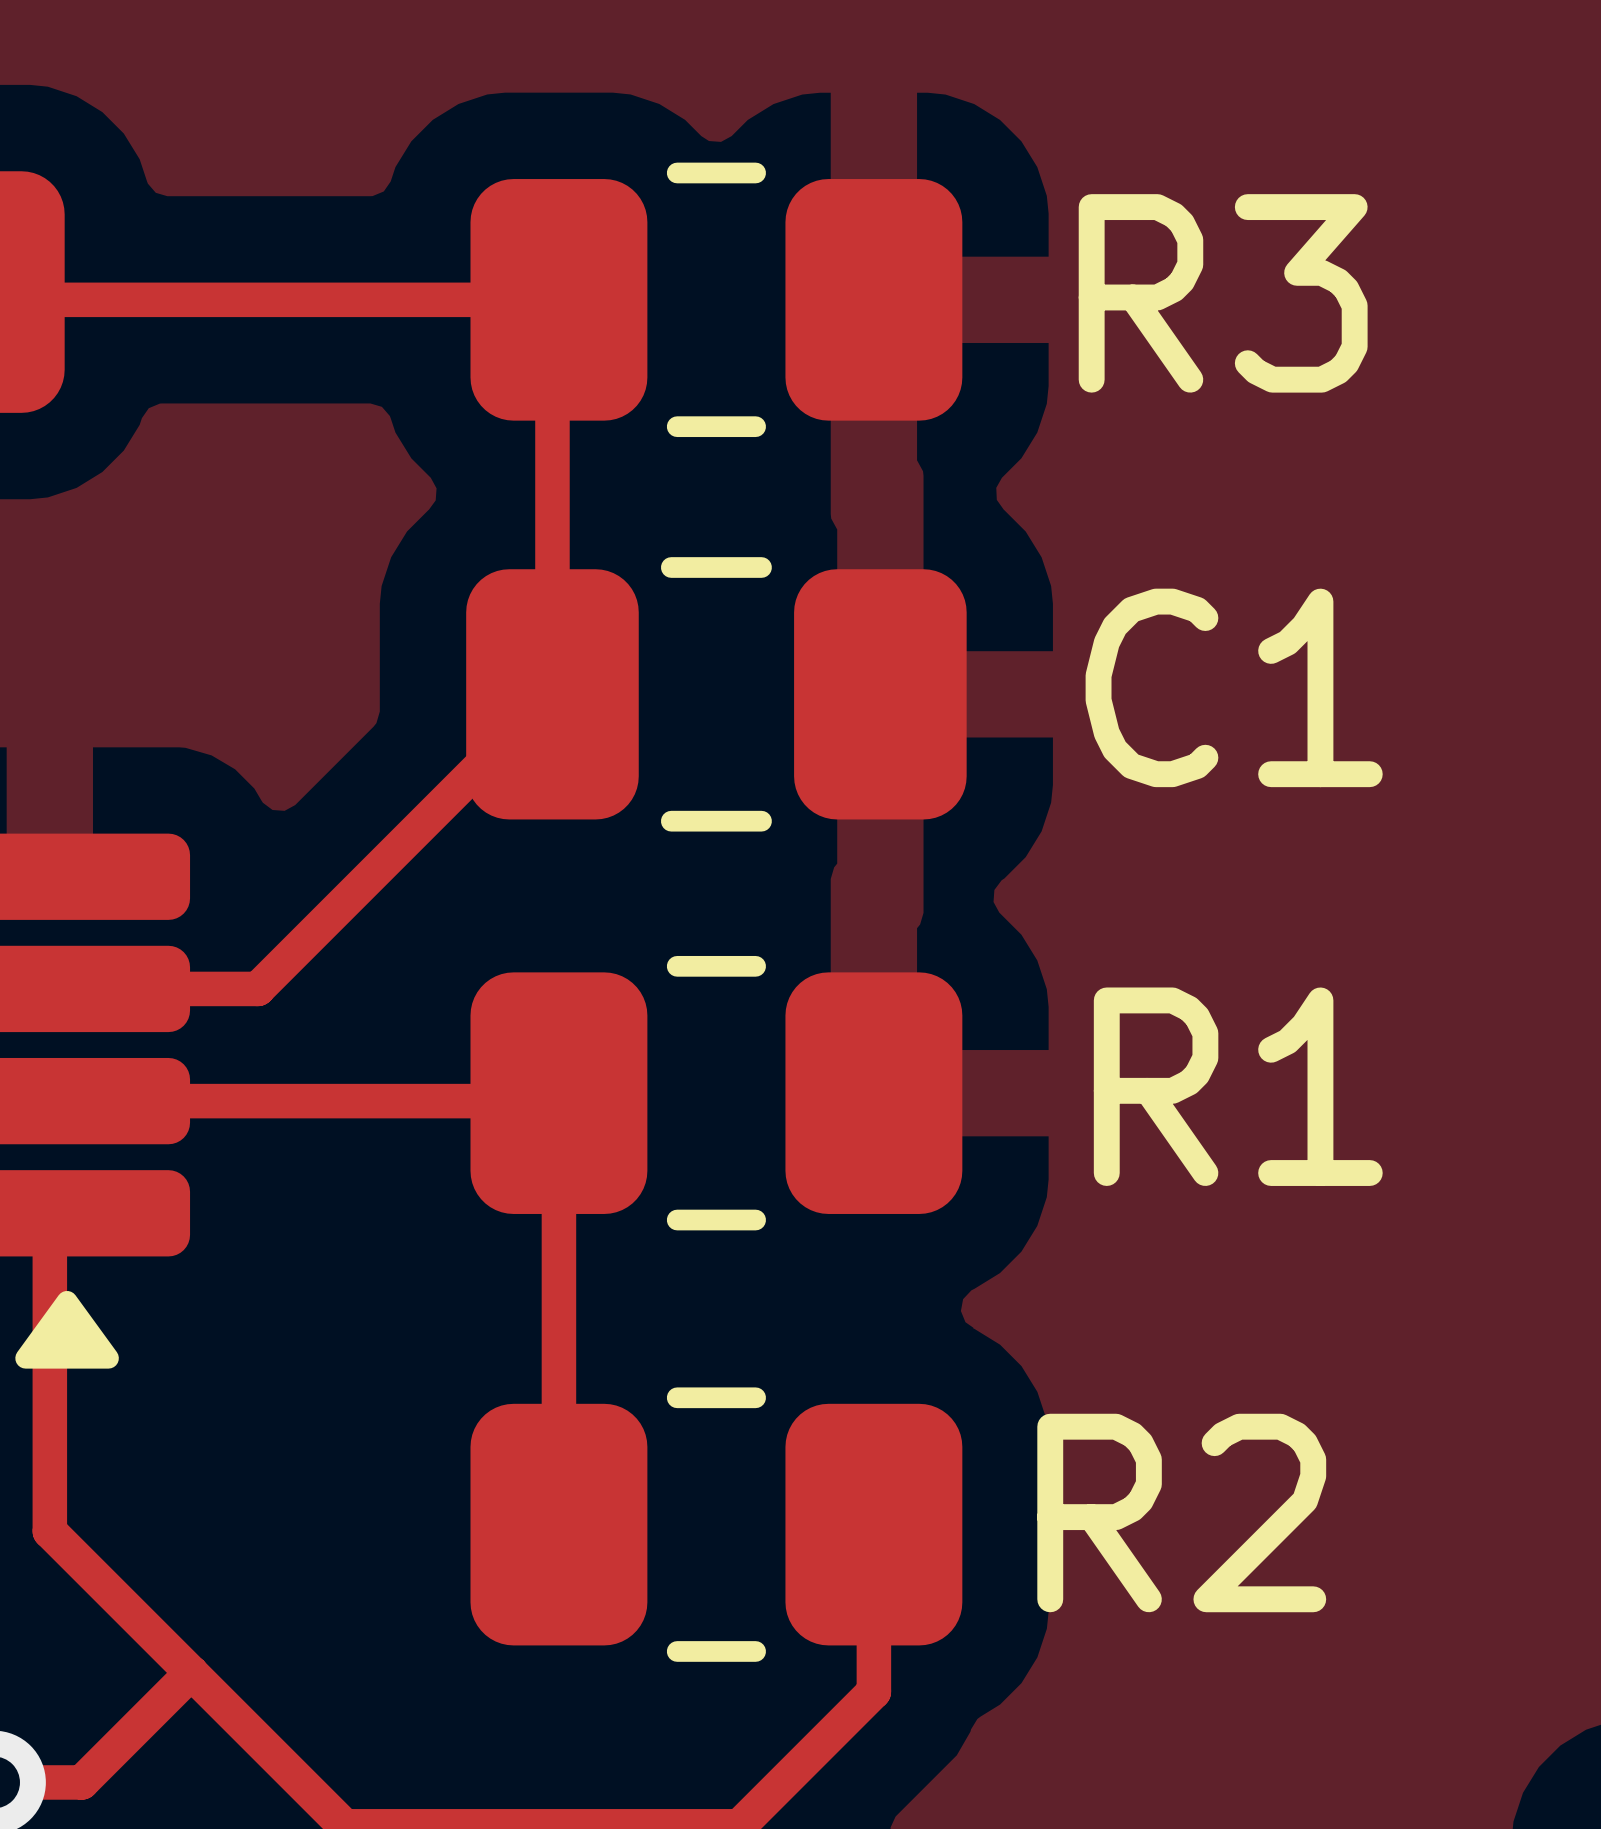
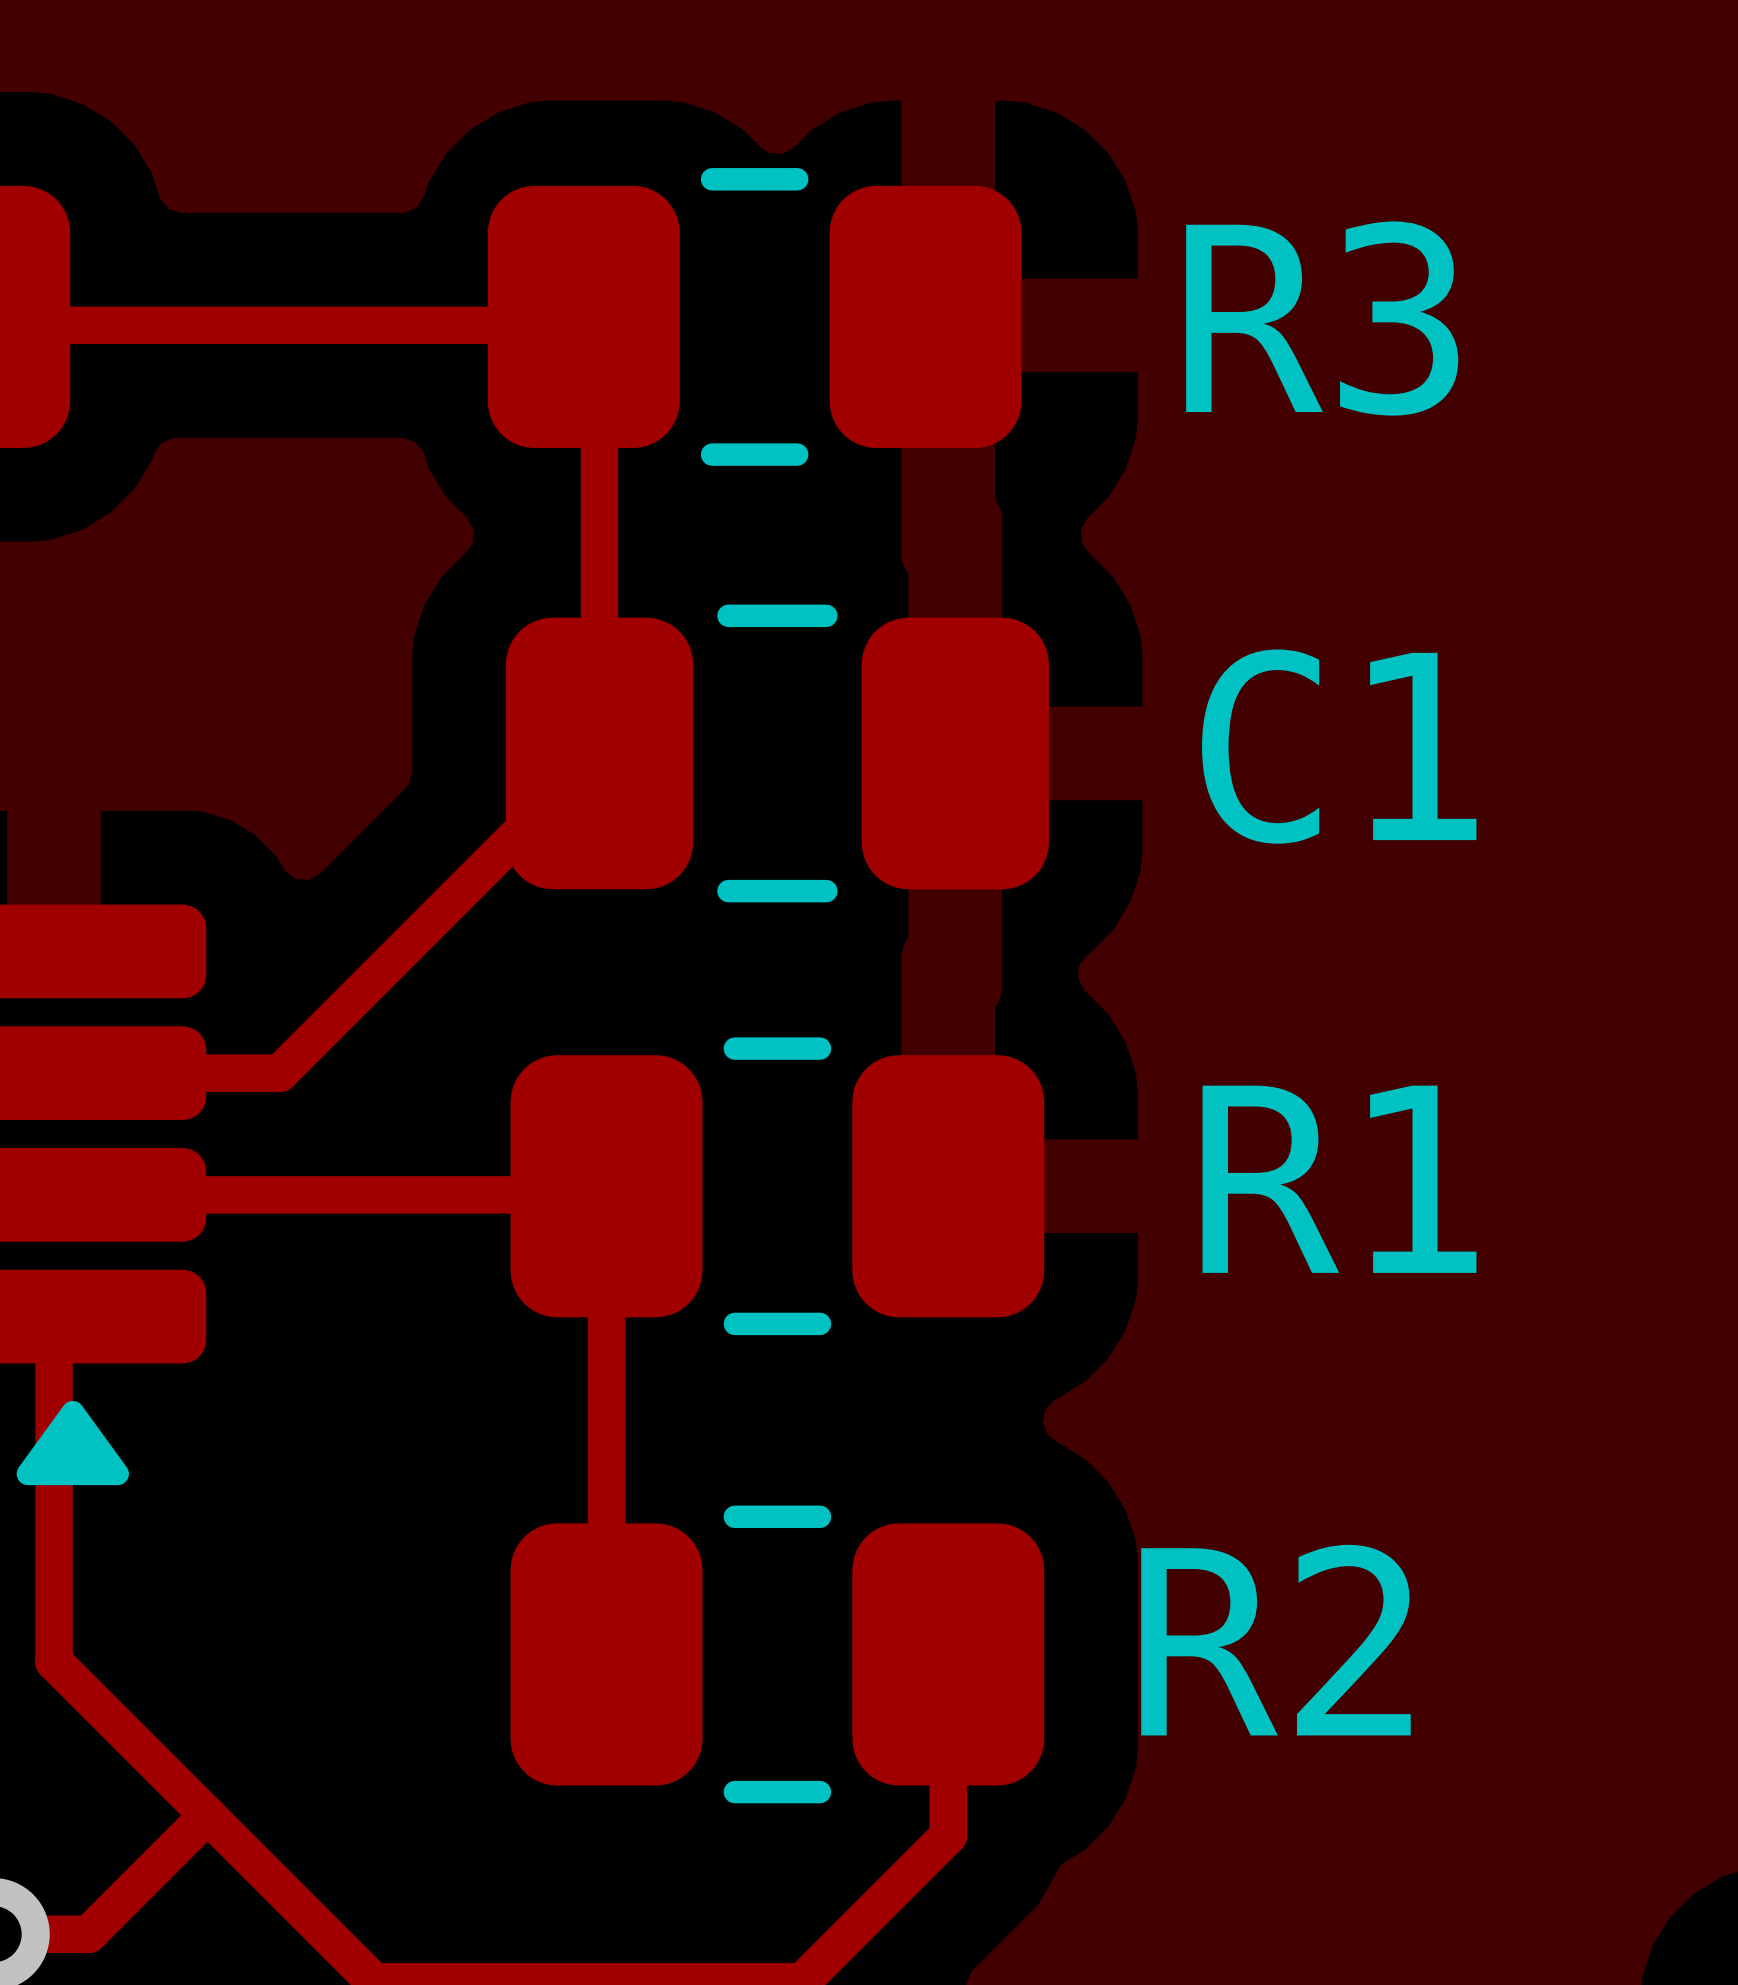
R3 position: (716, 299) -> (754, 316)

